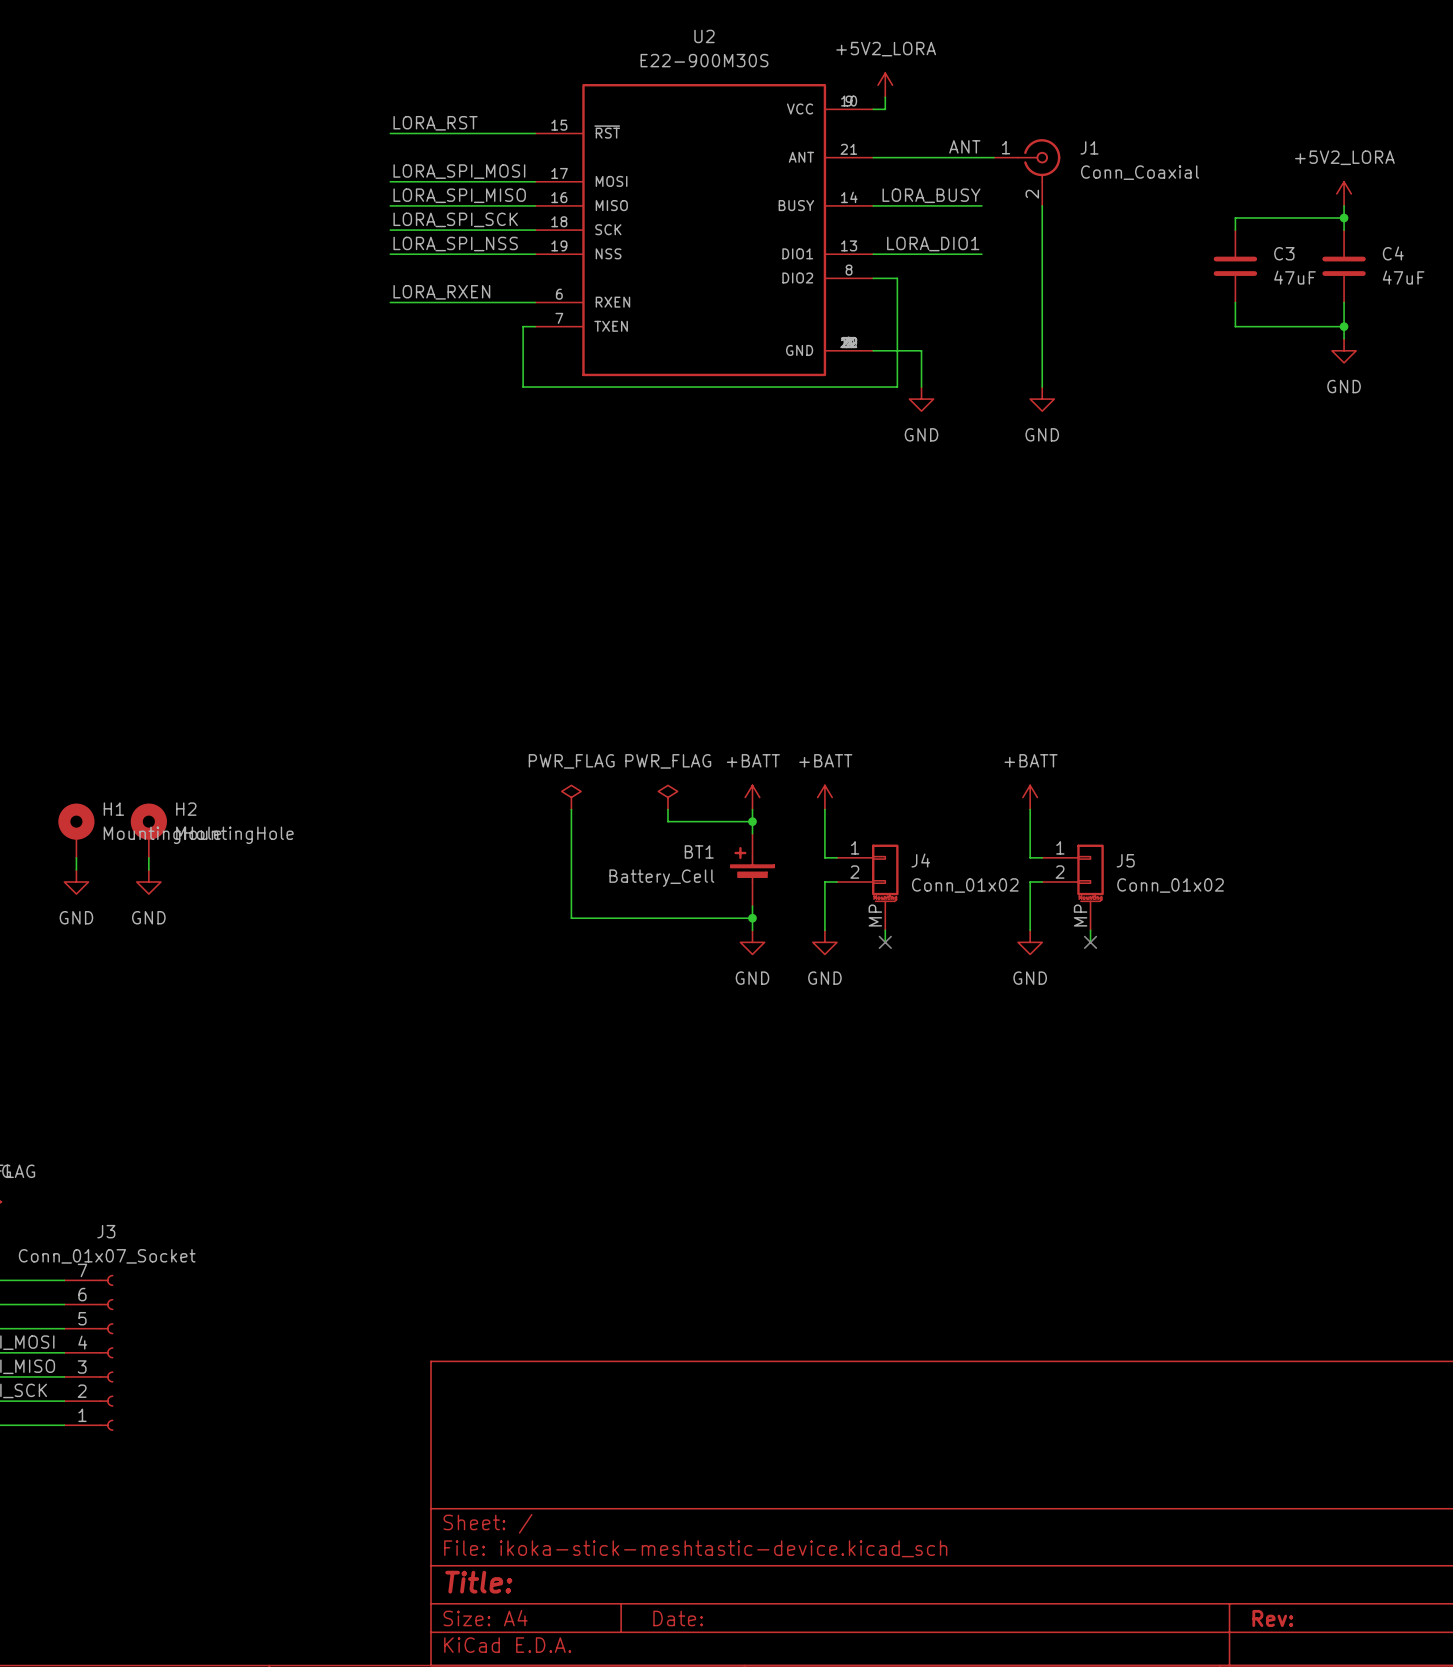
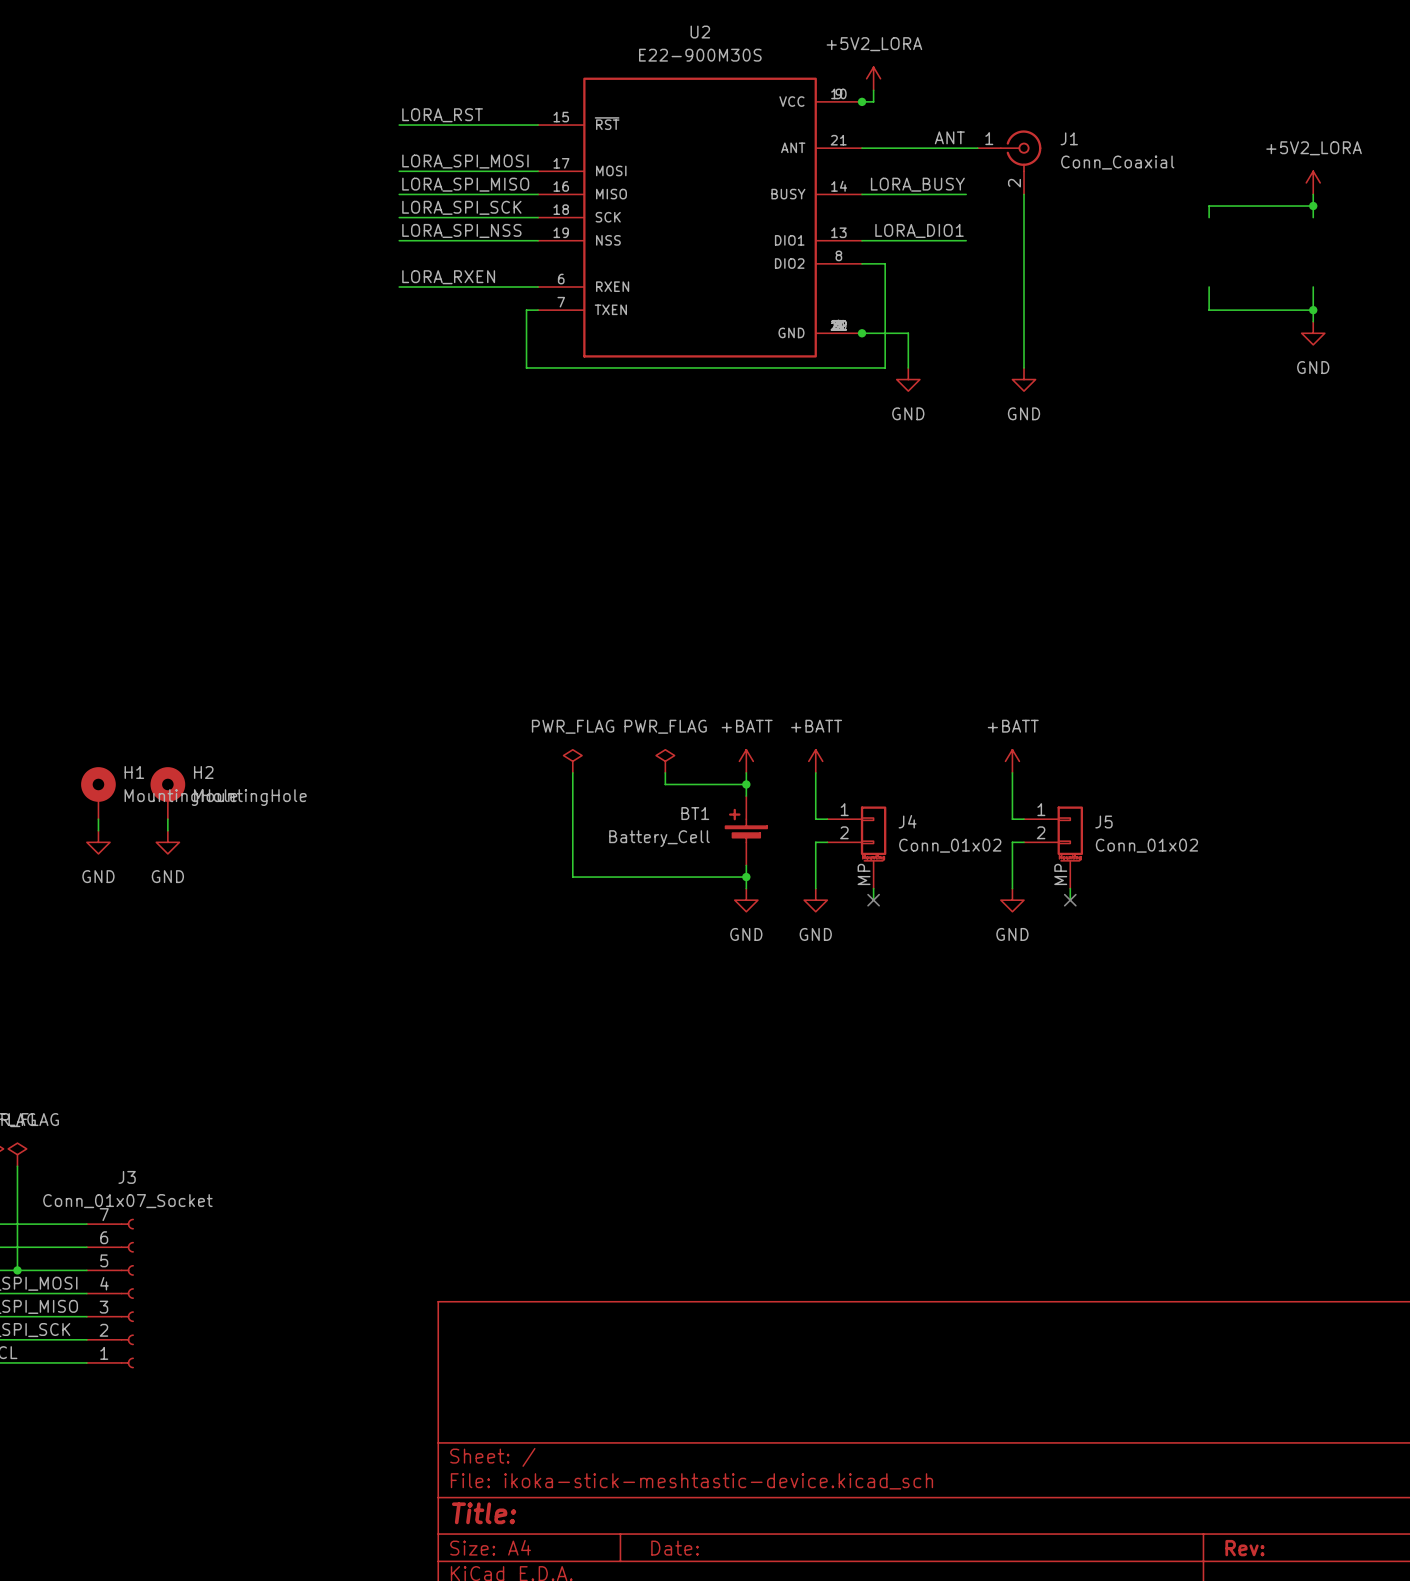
junction: none -> (862, 101)
C3: 47uF (1235, 266) -> none
C4: 47uF (1344, 266) -> none
junction: none -> (862, 333)

